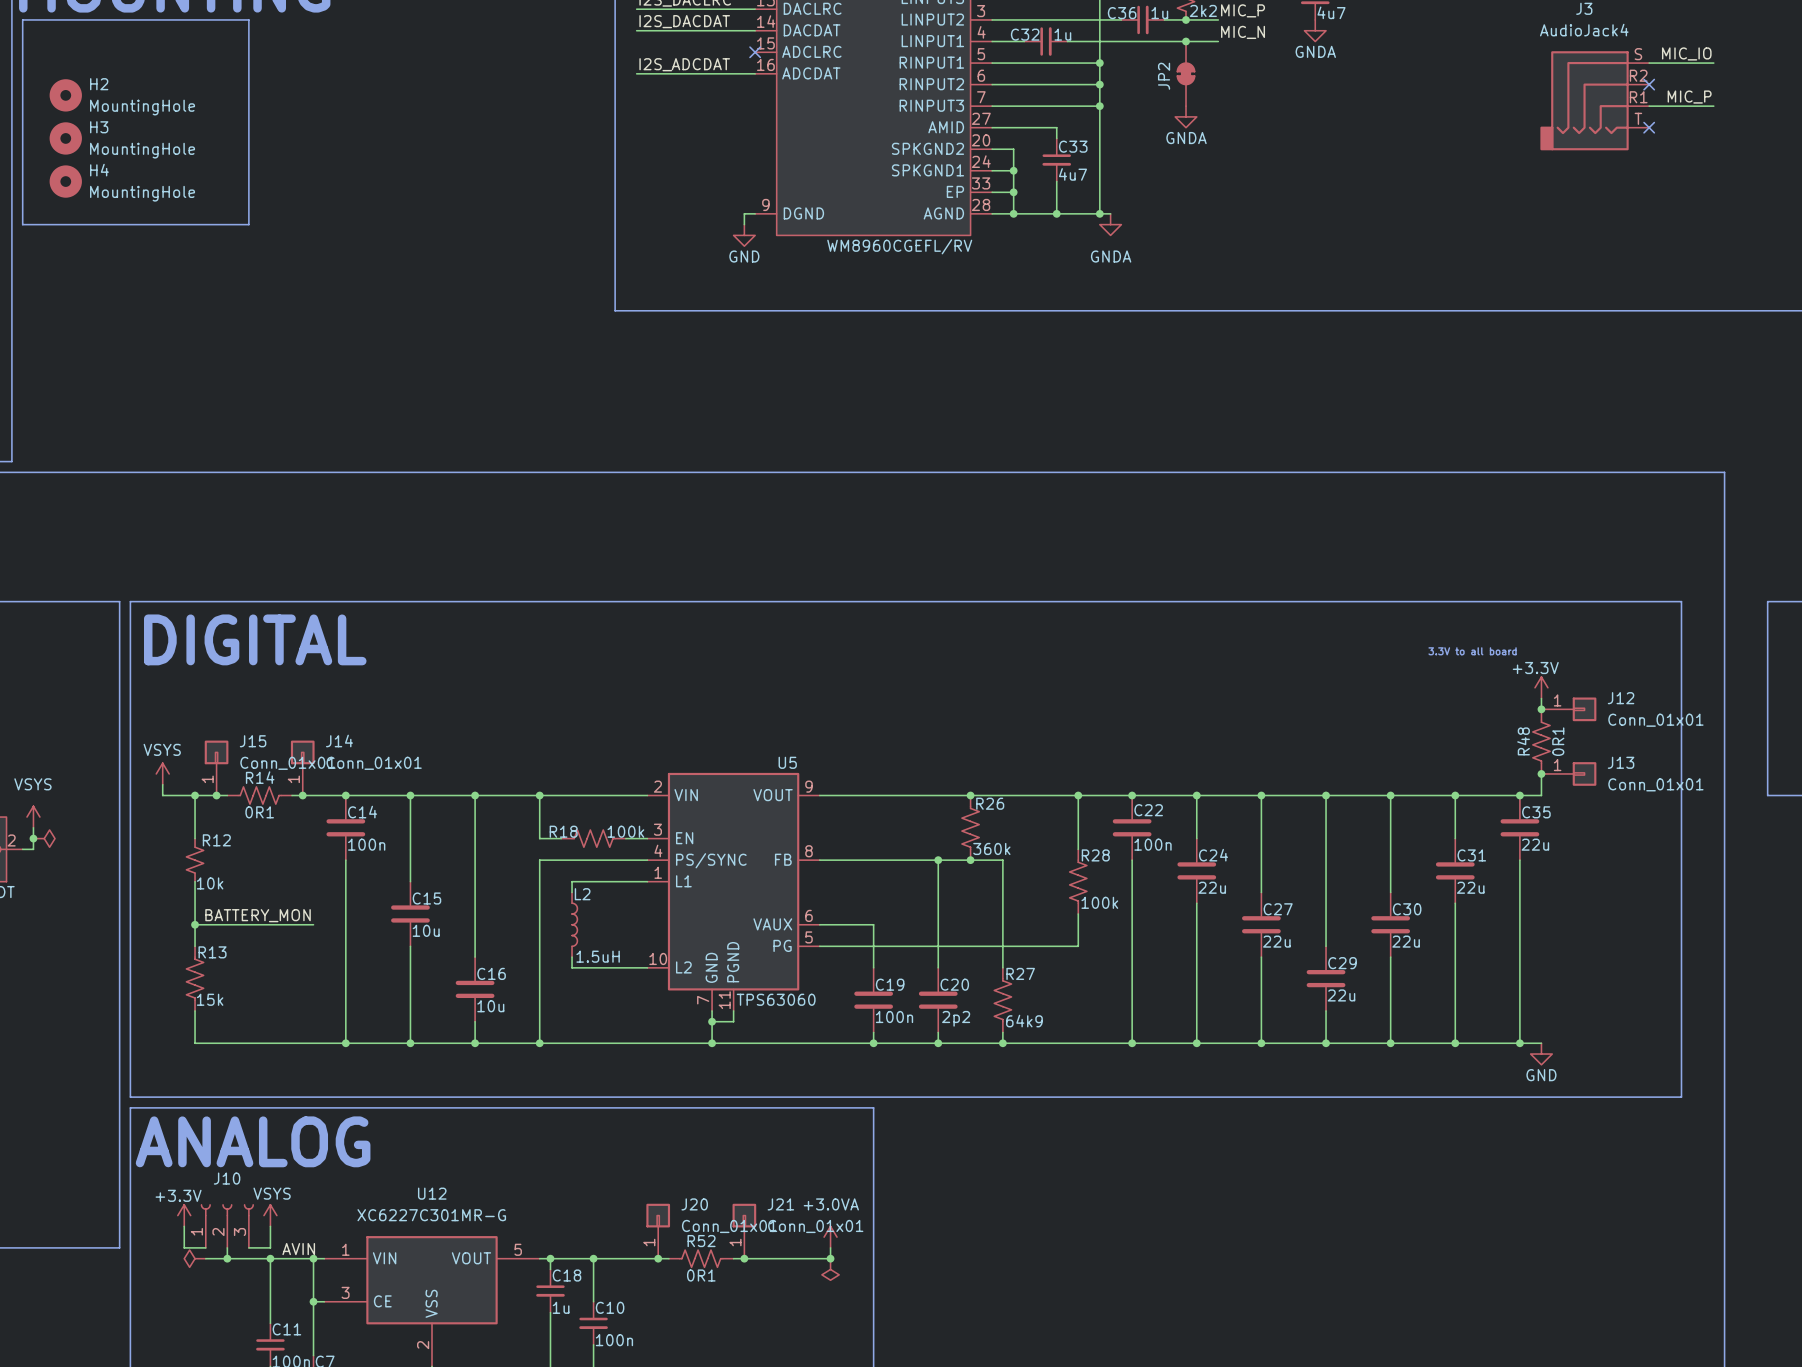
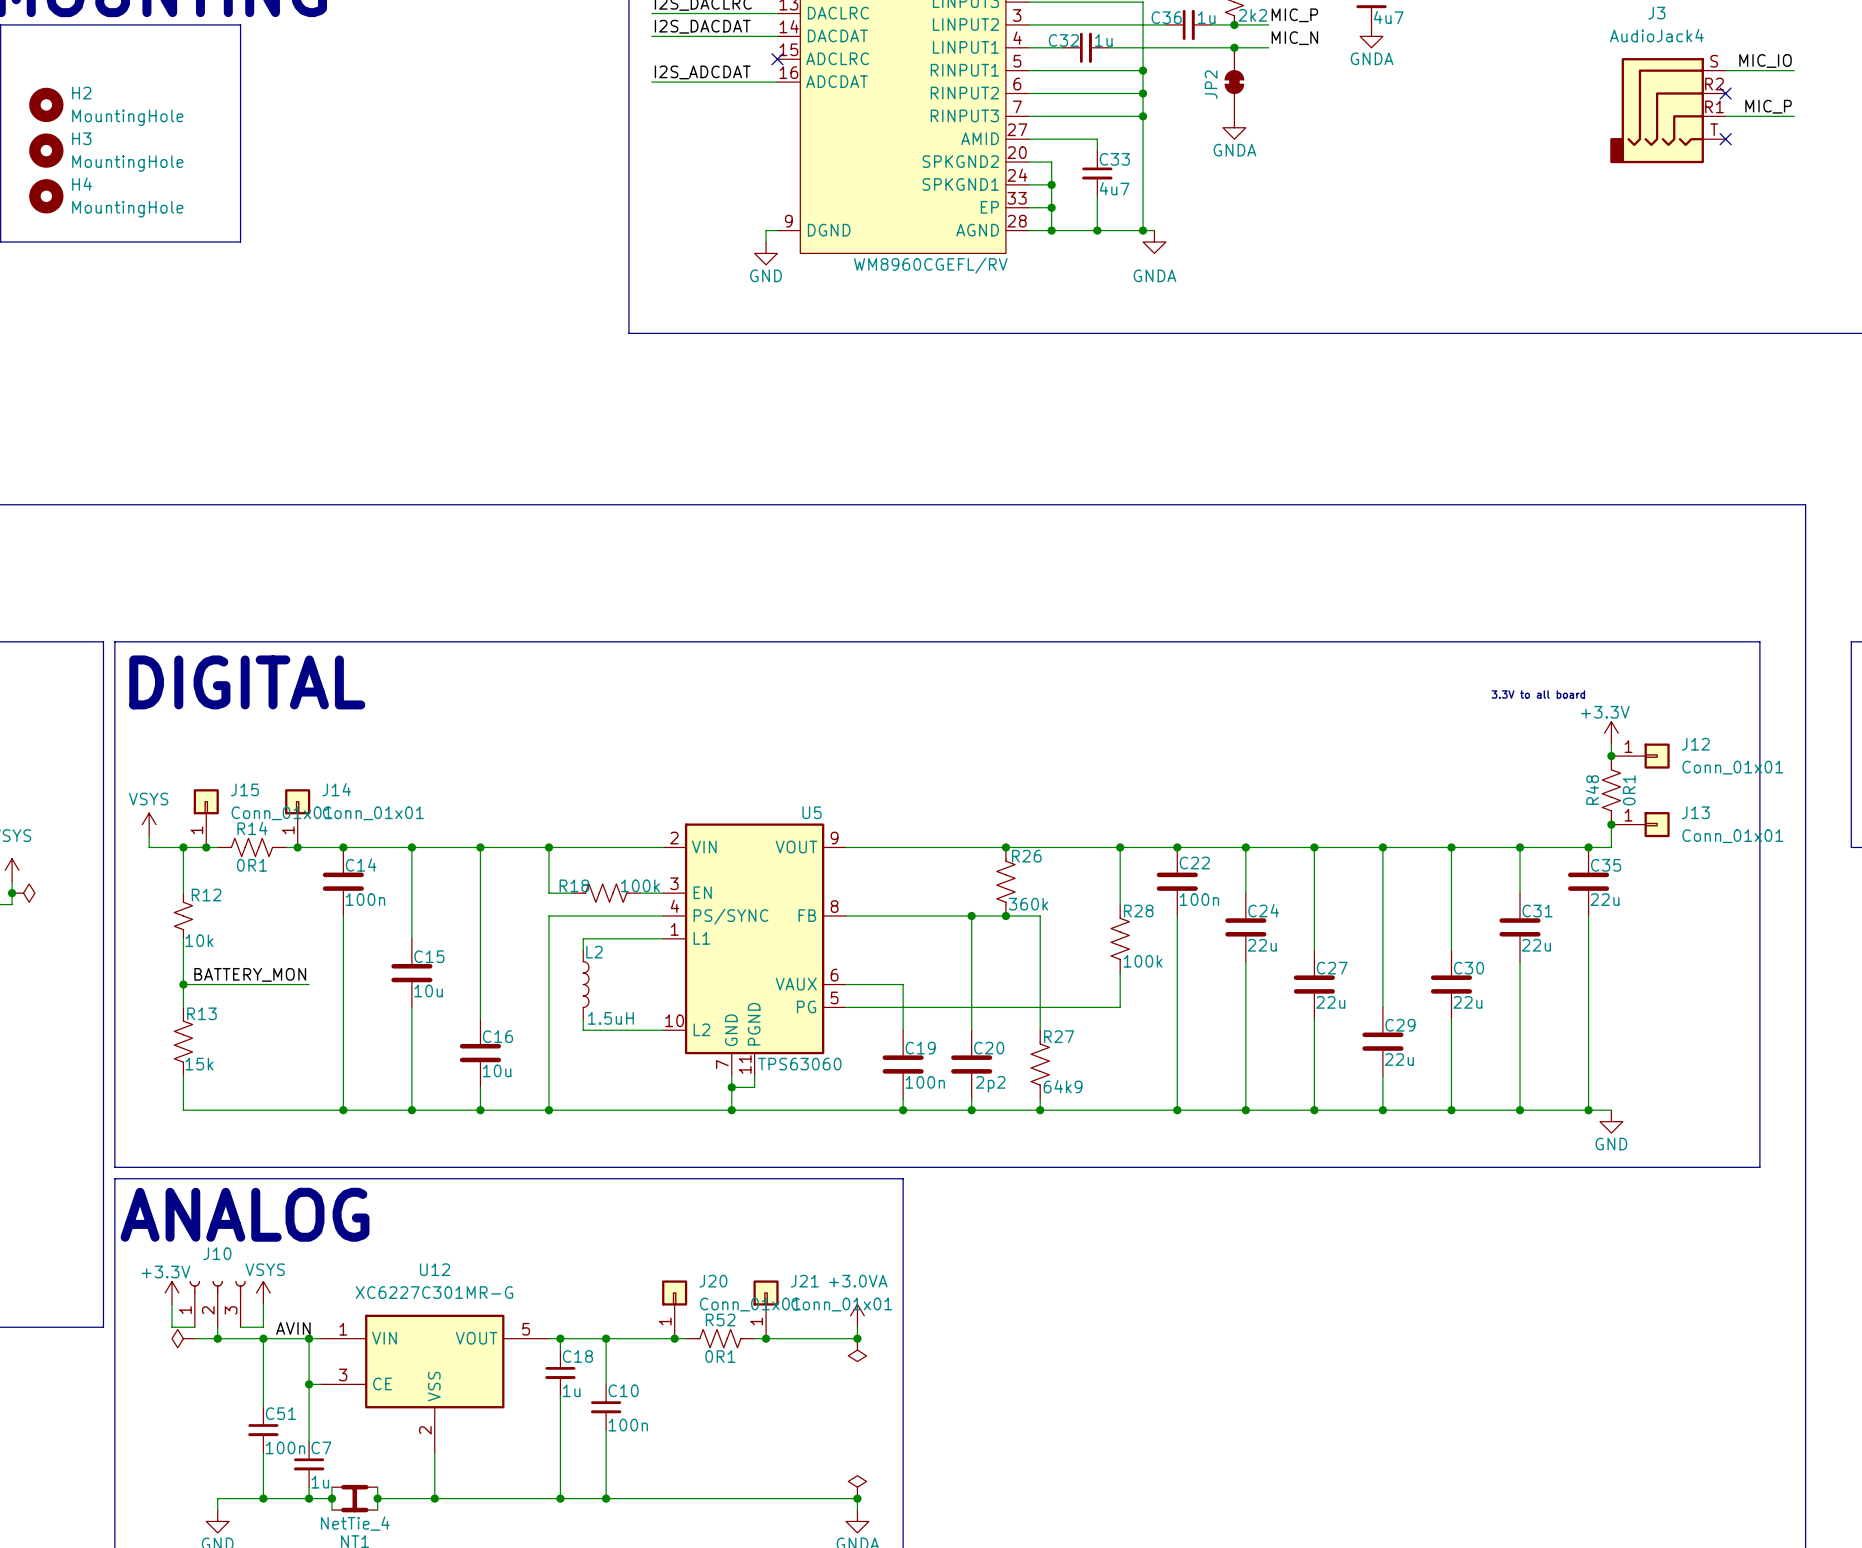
C11 name: C11 (286, 1329) -> C51 (280, 1413)

